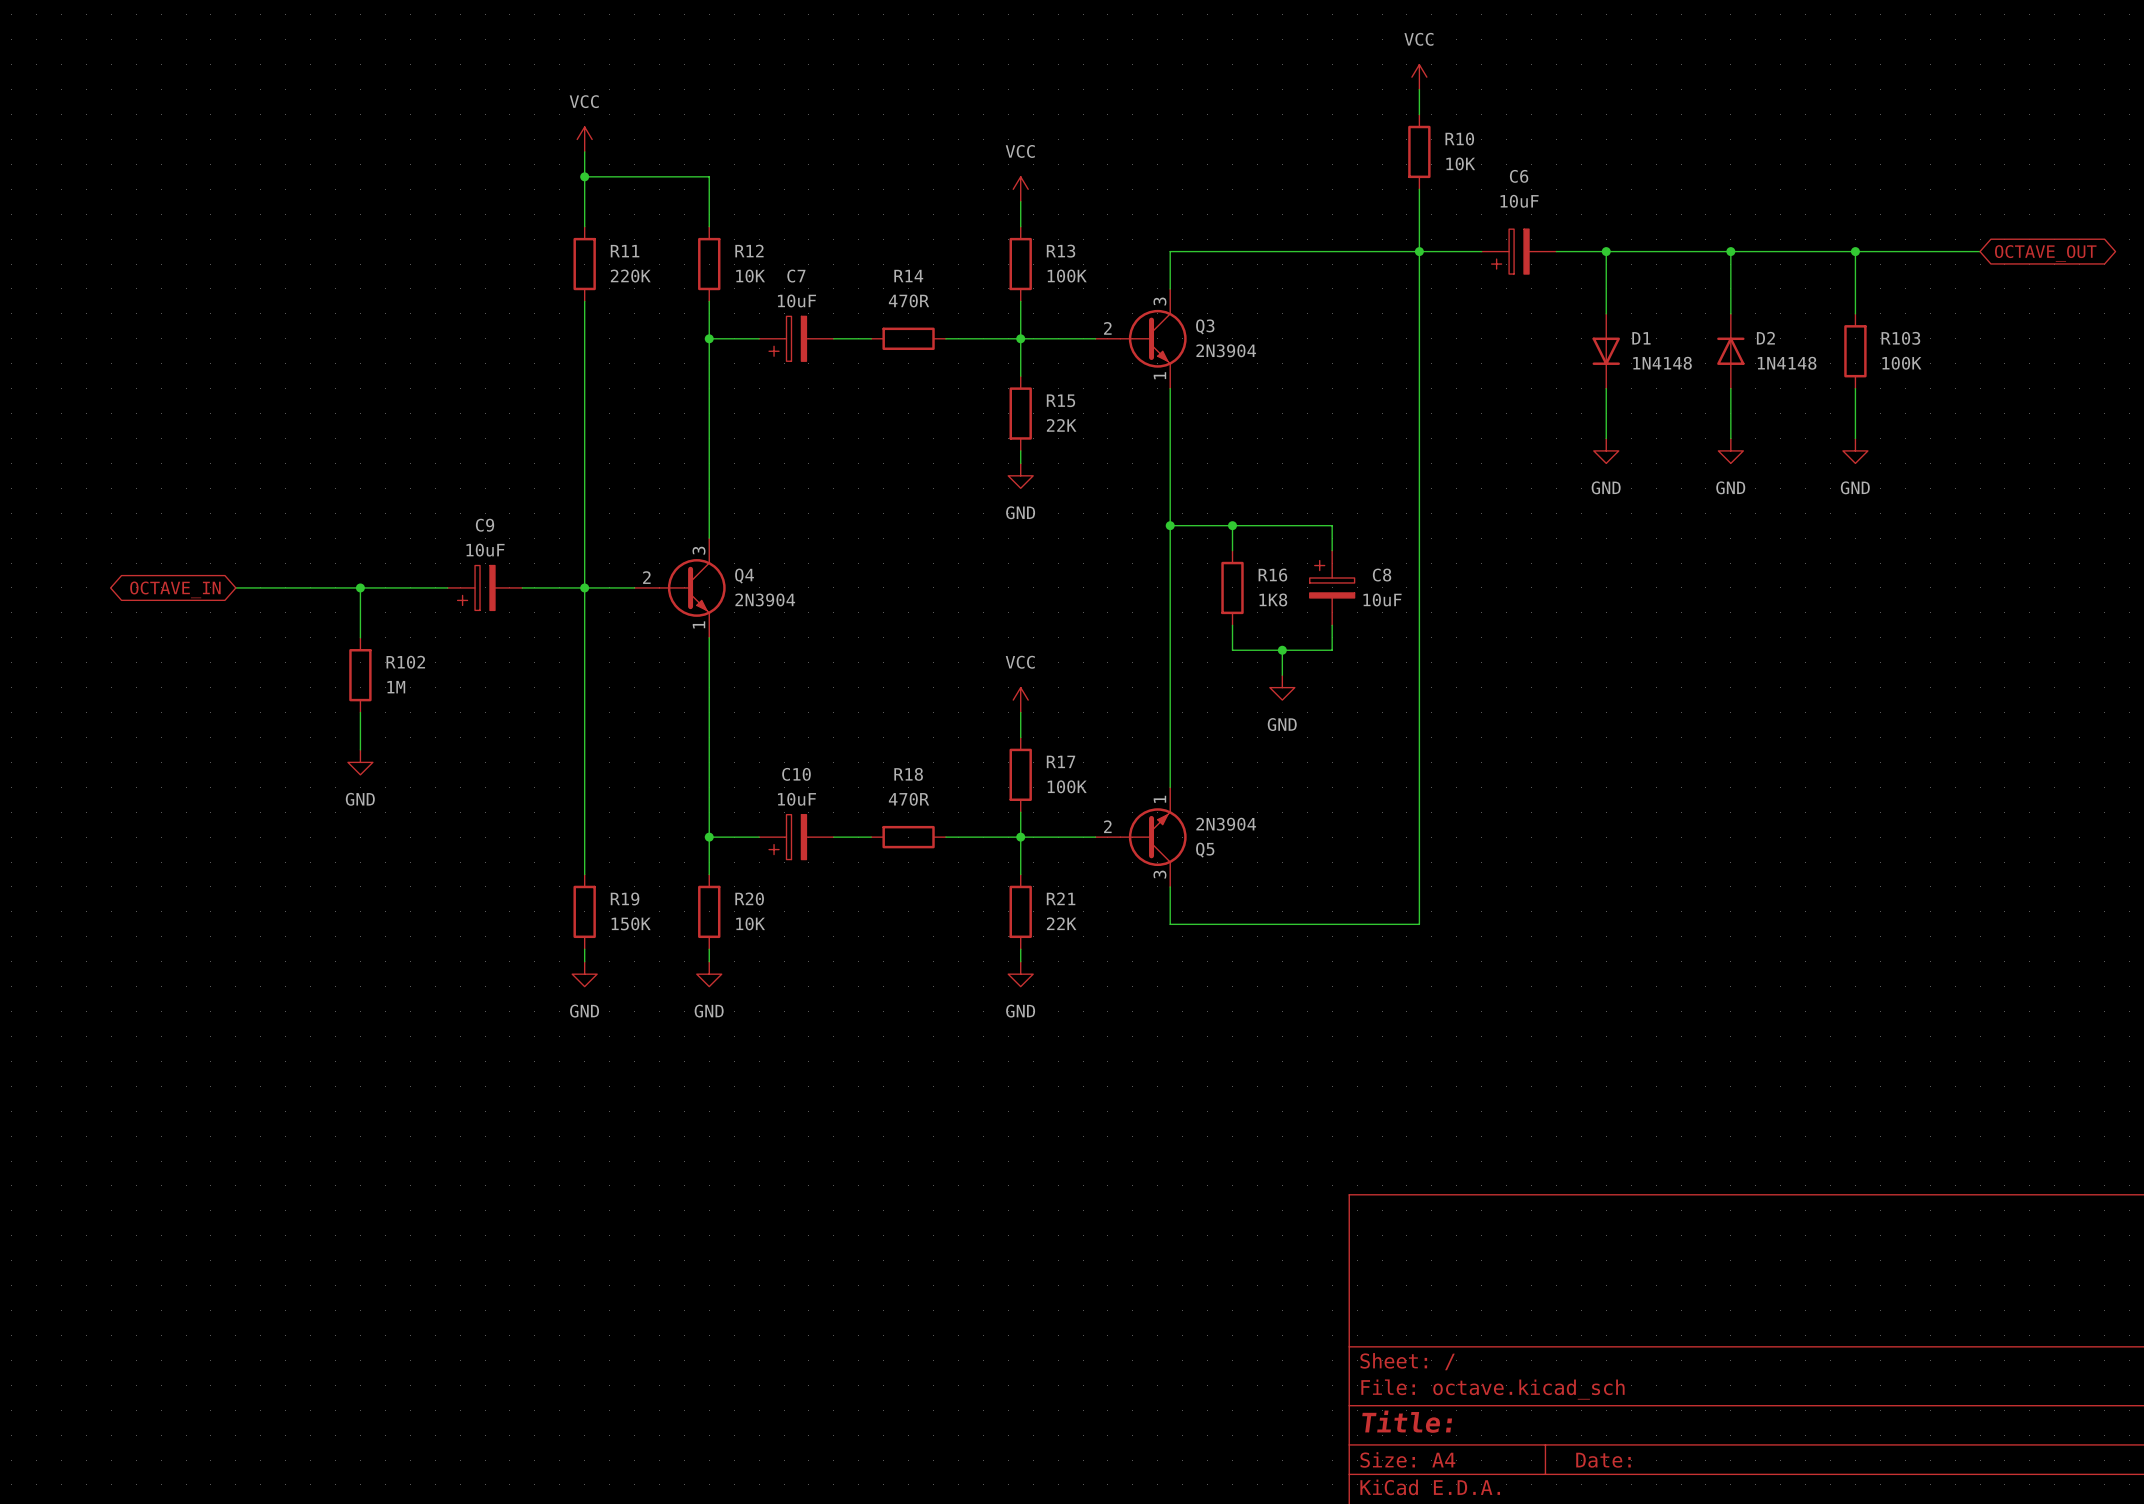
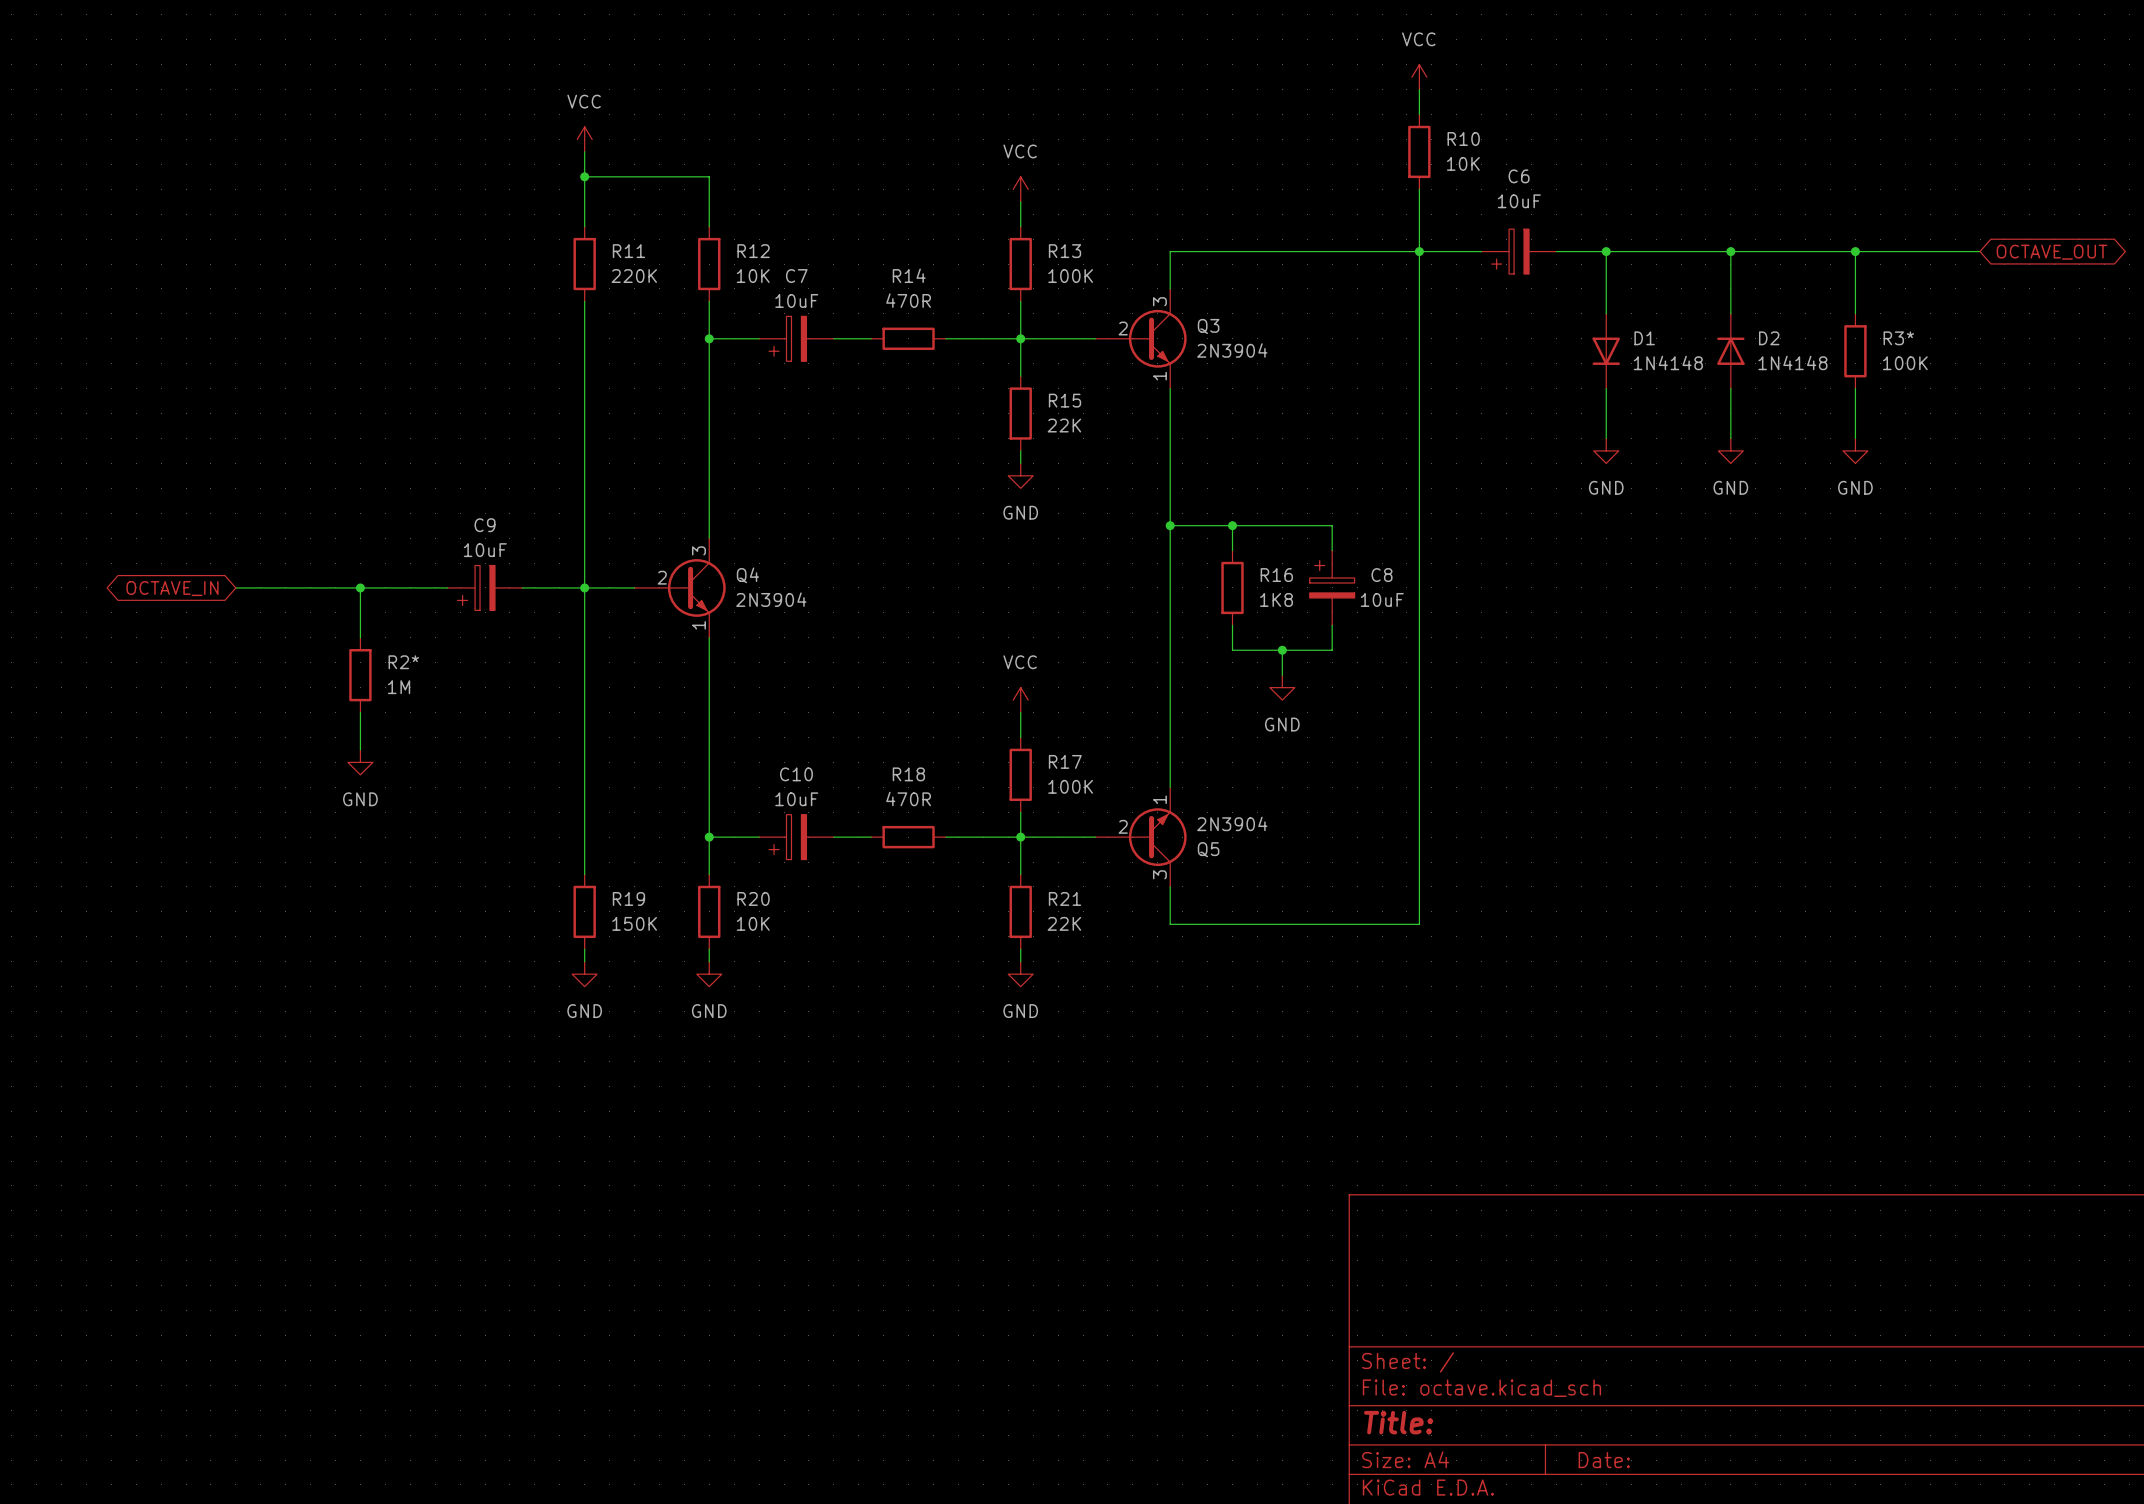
Q3 symbol: [1095, 288, 1187, 389] -> [1095, 288, 1187, 389]
R103 name: R103 (1900, 338) -> R3* (1898, 338)
Q4 symbol: [634, 538, 726, 638] -> [634, 538, 726, 638]
R102 name: R102 (405, 662) -> R2* (403, 662)
Q5 symbol: [1095, 787, 1187, 887] -> [1095, 787, 1187, 887]

